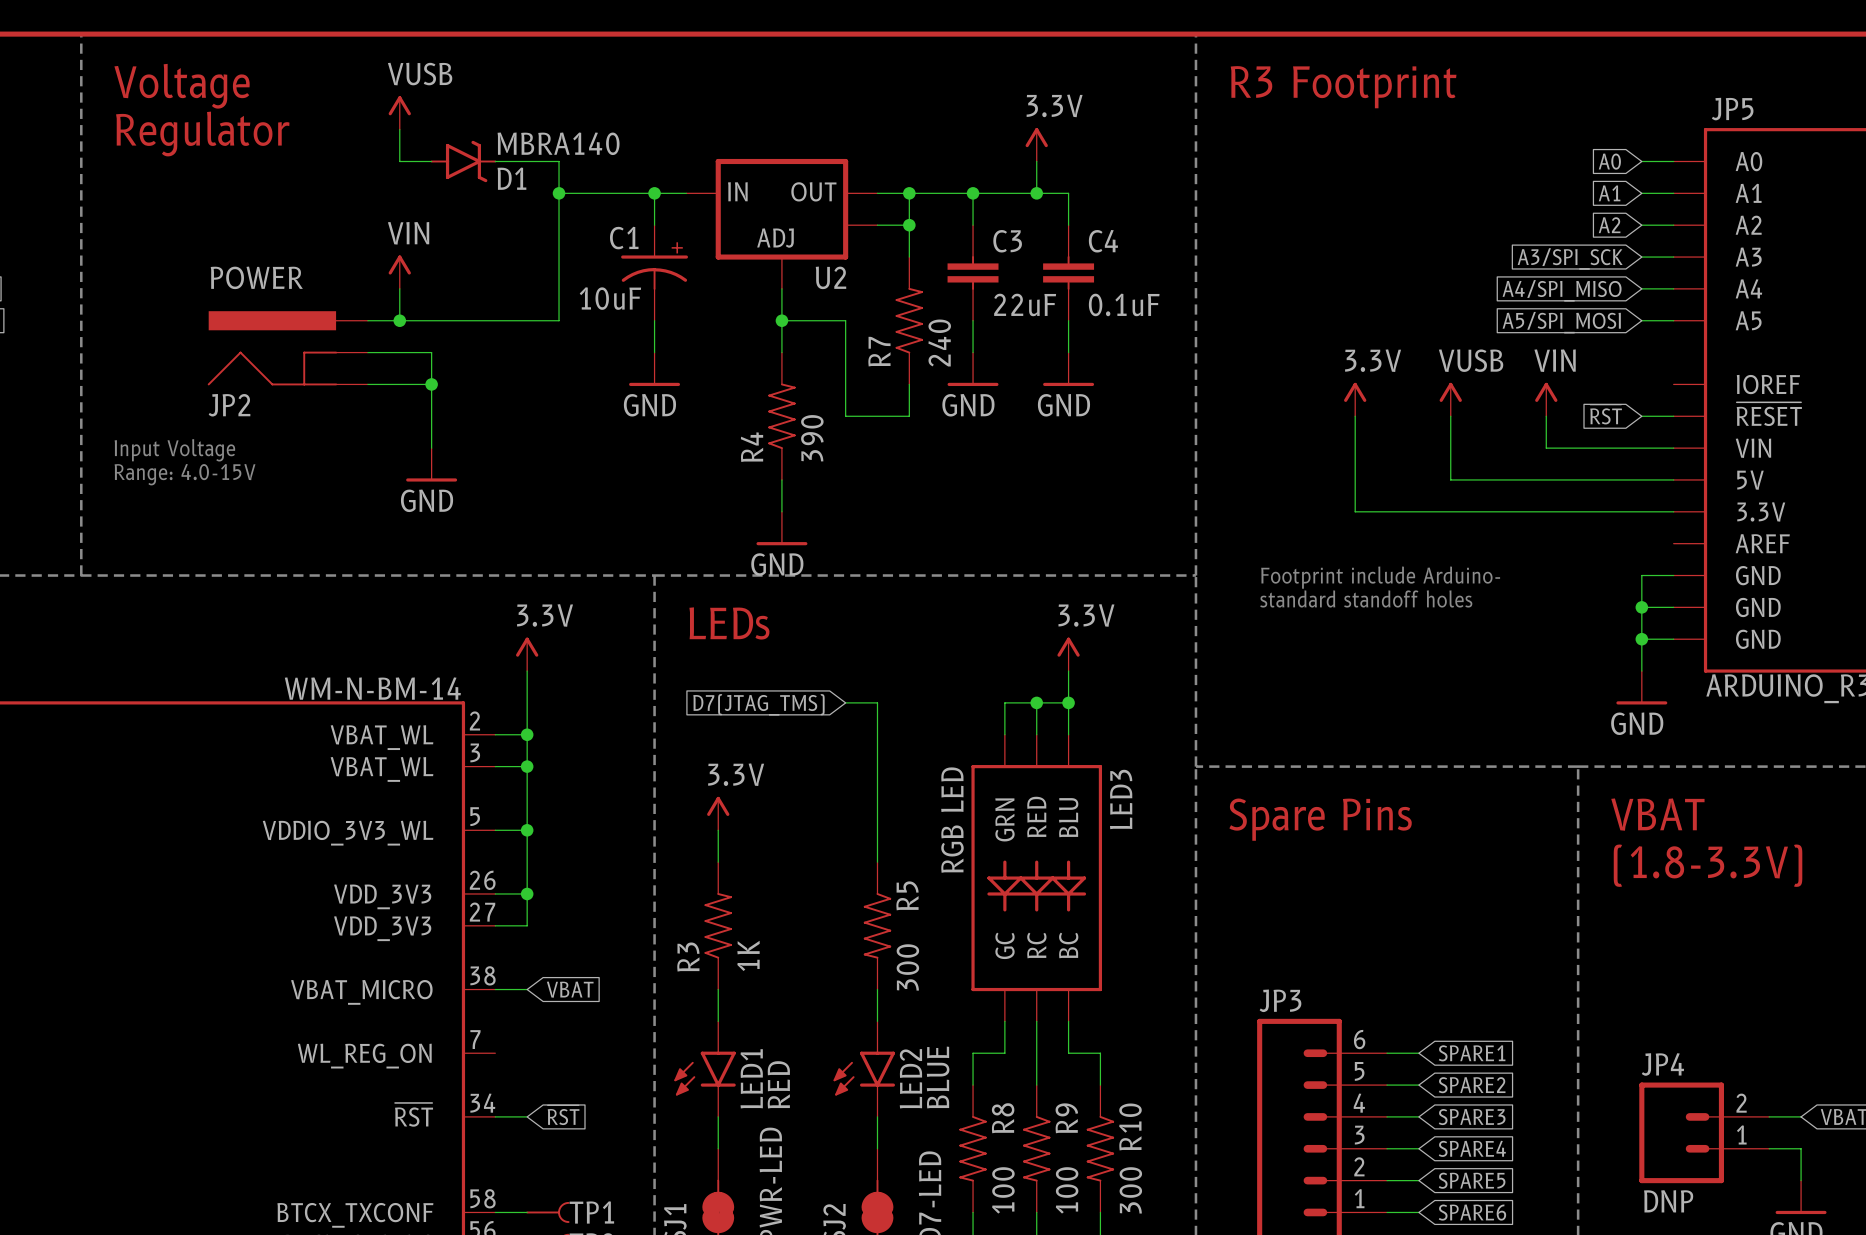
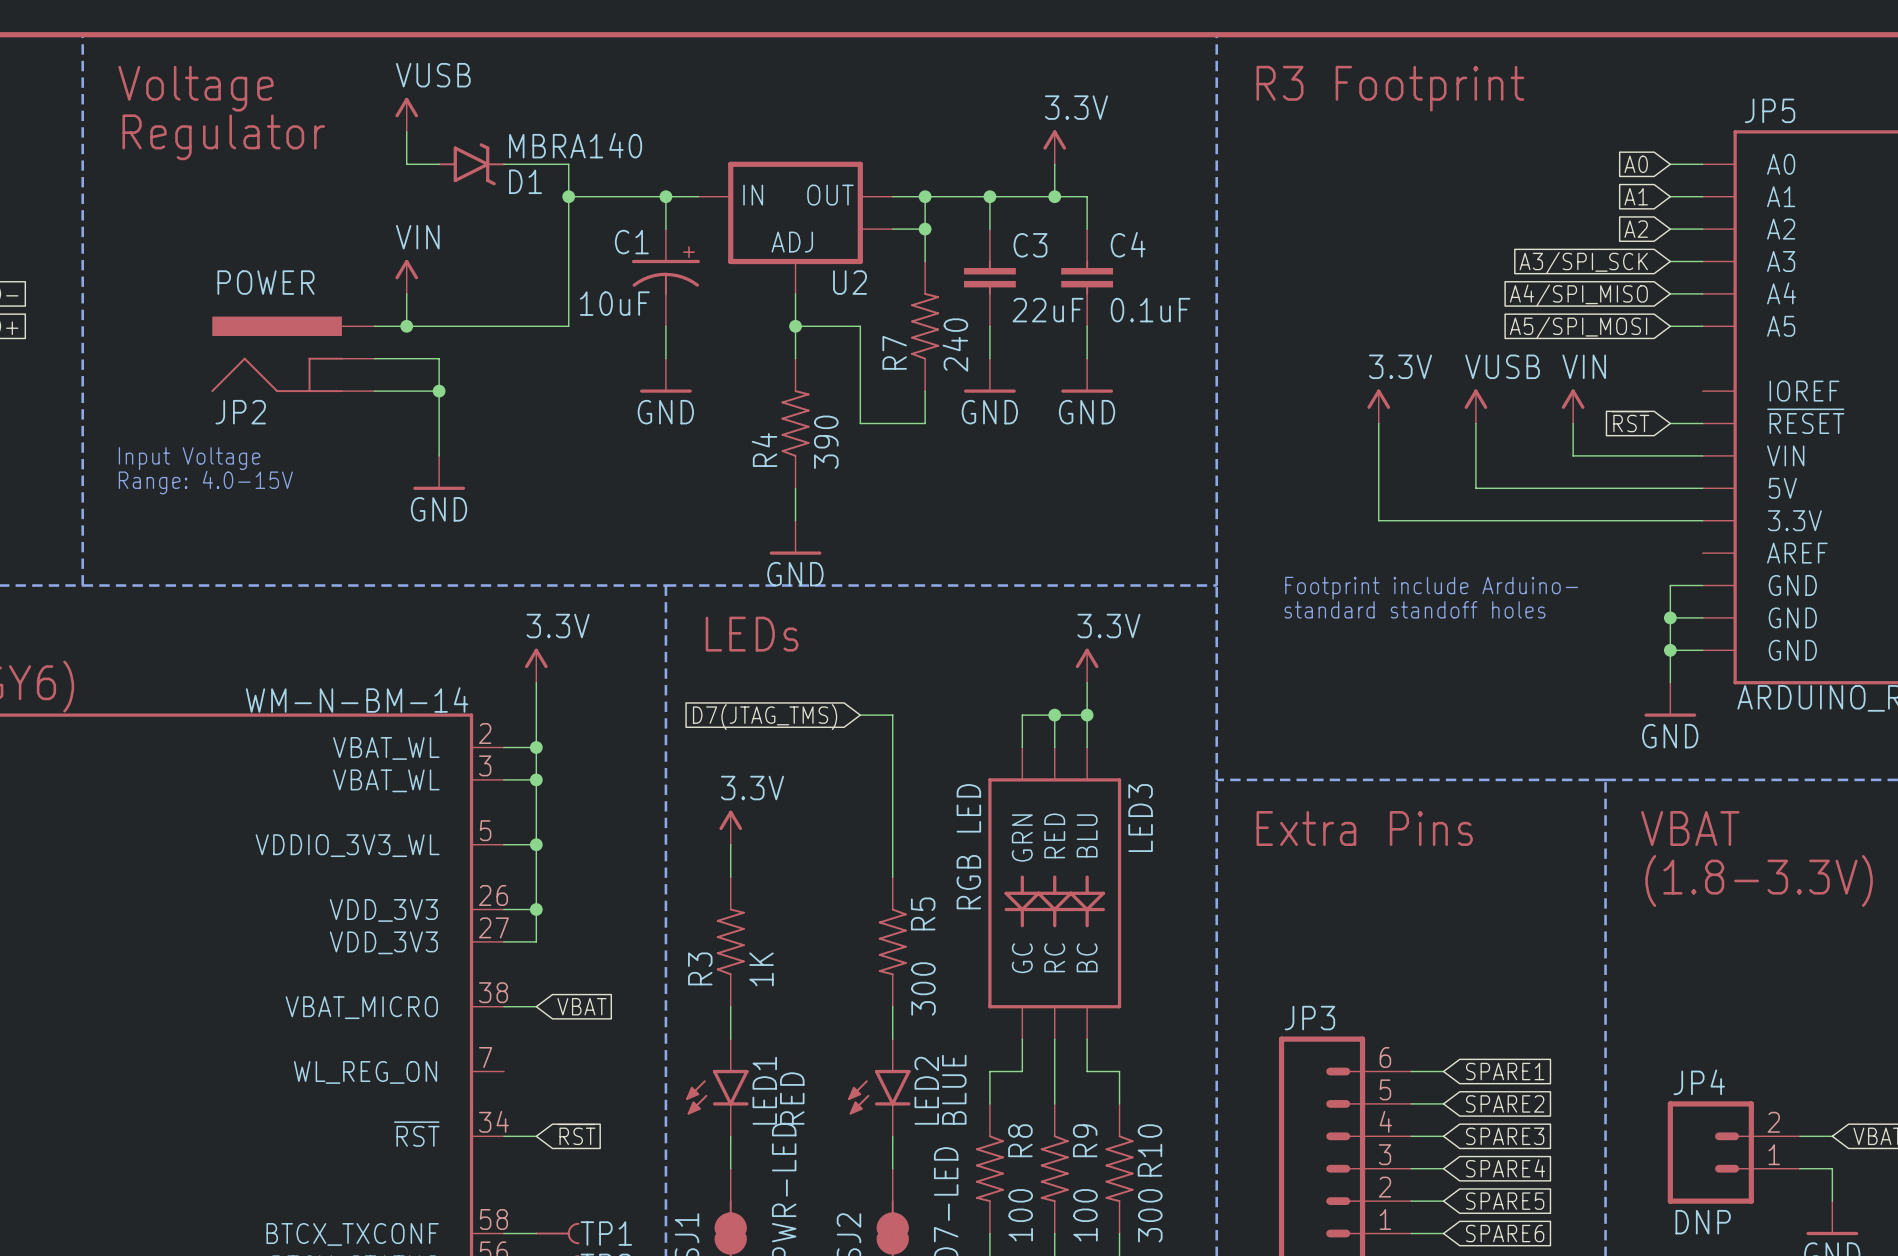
text: Spare Pins (1320, 819) -> Extra Pins (1364, 828)

